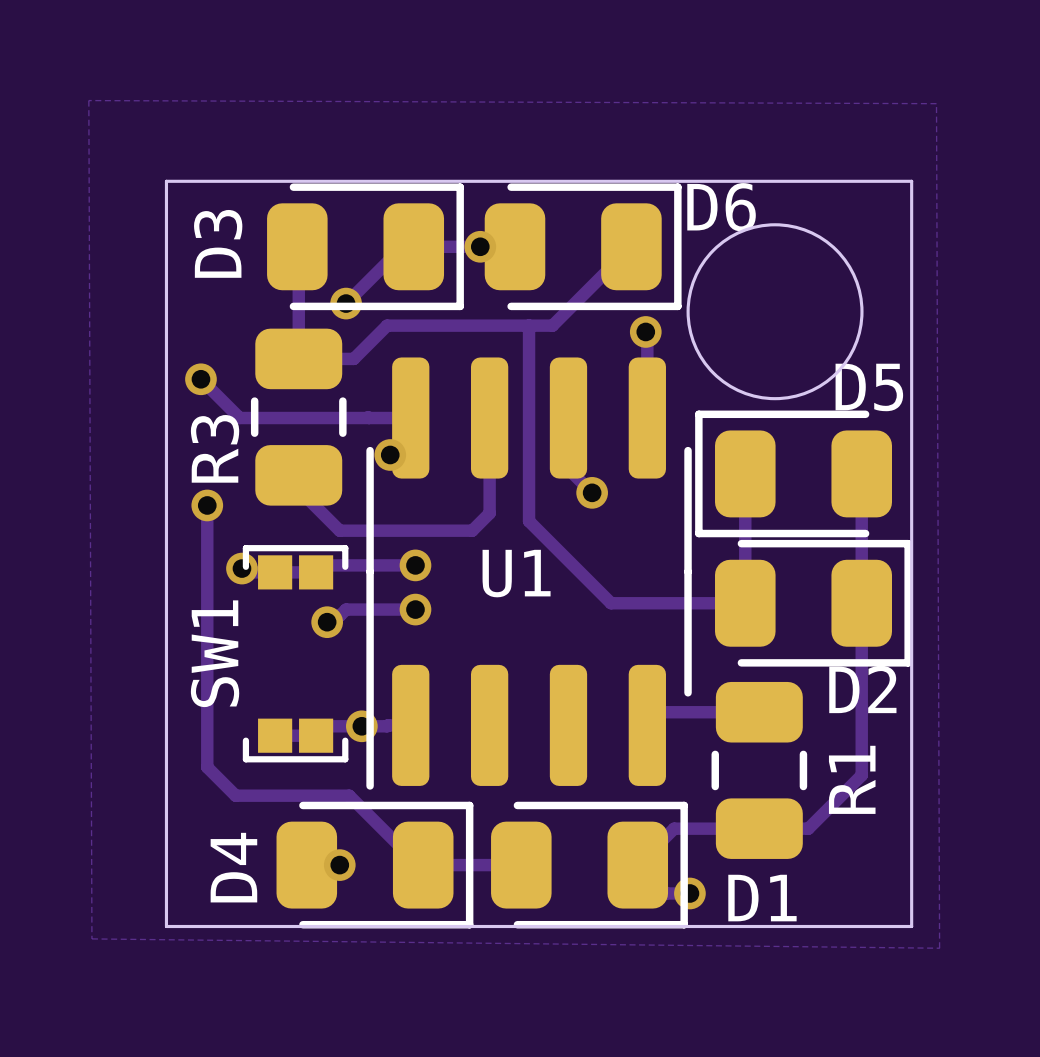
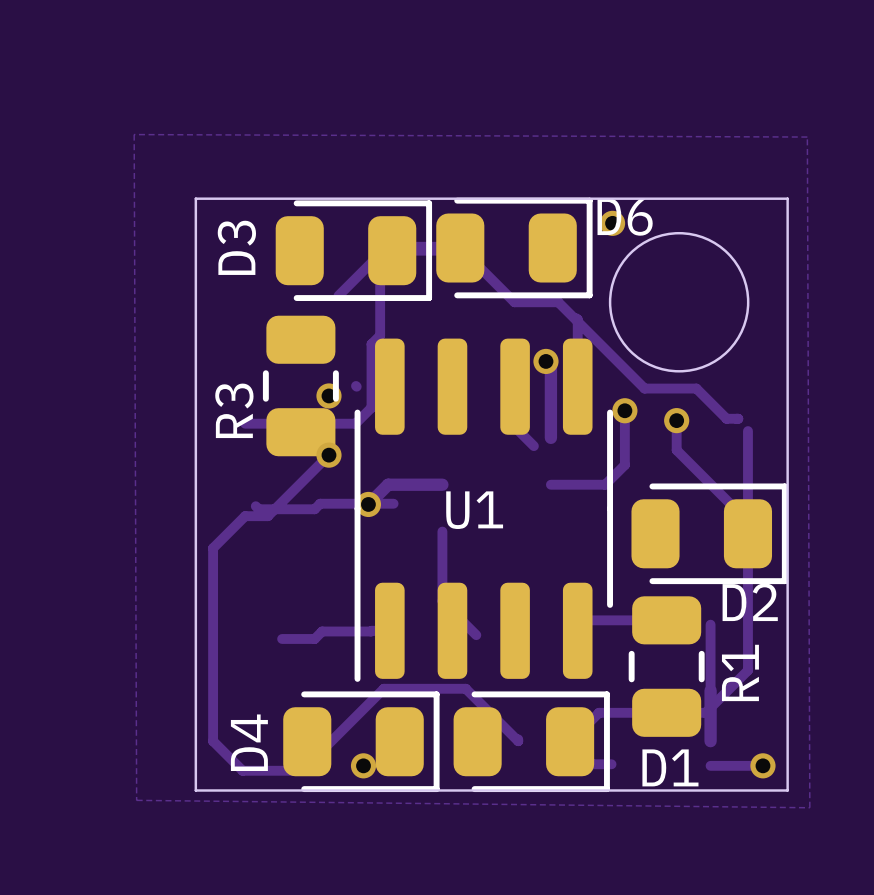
via: none -> (612, 223)
track: none -> (380, 248) (460, 248) (514, 302) (558, 302) (644, 388) (696, 388) (726, 418) (738, 418)
track: (297, 246) (298, 358) (353, 358) (387, 325) (552, 325) (631, 246) -> none
track: none -> (380, 250) (380, 335) (371, 344) (371, 407) (355, 423) (245, 423)
via: (480, 246) -> none
D6 position: (583, 246) -> (514, 248)
via: (346, 303) -> none
track: (529, 325) (529, 521) (611, 603) (745, 603) (745, 473) -> none
via: (645, 331) -> none
track: (200, 379) (239, 418) (410, 418) (410, 434) (390, 454) -> none
via: (200, 379) -> none
track: none -> (545, 361) (550, 366) (550, 437)
via: none -> (545, 361)
track: (489, 418) (489, 513) (472, 530) (339, 530) (298, 489) (298, 475) (331, 475) -> none
via: none -> (328, 395)
track: none -> (624, 410) (624, 465) (605, 484) (550, 484)
via: none -> (624, 410)
via: (390, 454) -> none
track: none -> (676, 420) (676, 450) (737, 511)
via: none -> (676, 420)
D5: (793, 473) -> none
via: (592, 492) -> none
track: none -> (328, 455) (267, 516) (245, 516) (213, 548) (213, 741) (242, 770) (301, 770) (383, 688) (465, 688) (518, 741) (518, 739)
via: none -> (328, 455)
track: (207, 505) (207, 767) (235, 795) (349, 795) (418, 865) (521, 865) -> none
via: (207, 505) -> none
track: none -> (442, 484) (388, 484) (368, 504)
via position: (415, 565) -> (368, 504)
via: (241, 568) -> none
track: none -> (442, 531) (442, 601) (476, 635)
track: (415, 609) (346, 609) (339, 615) (333, 615) (327, 622) -> none
via: (415, 609) -> none
via: (327, 622) -> none
SW1: (295, 653) -> none
track: none -> (710, 624) (710, 741)
via: (361, 726) -> none
via position: (339, 865) -> (363, 765)
via: (689, 893) -> none
track: none -> (710, 765) (762, 765)
via: none -> (762, 765)

